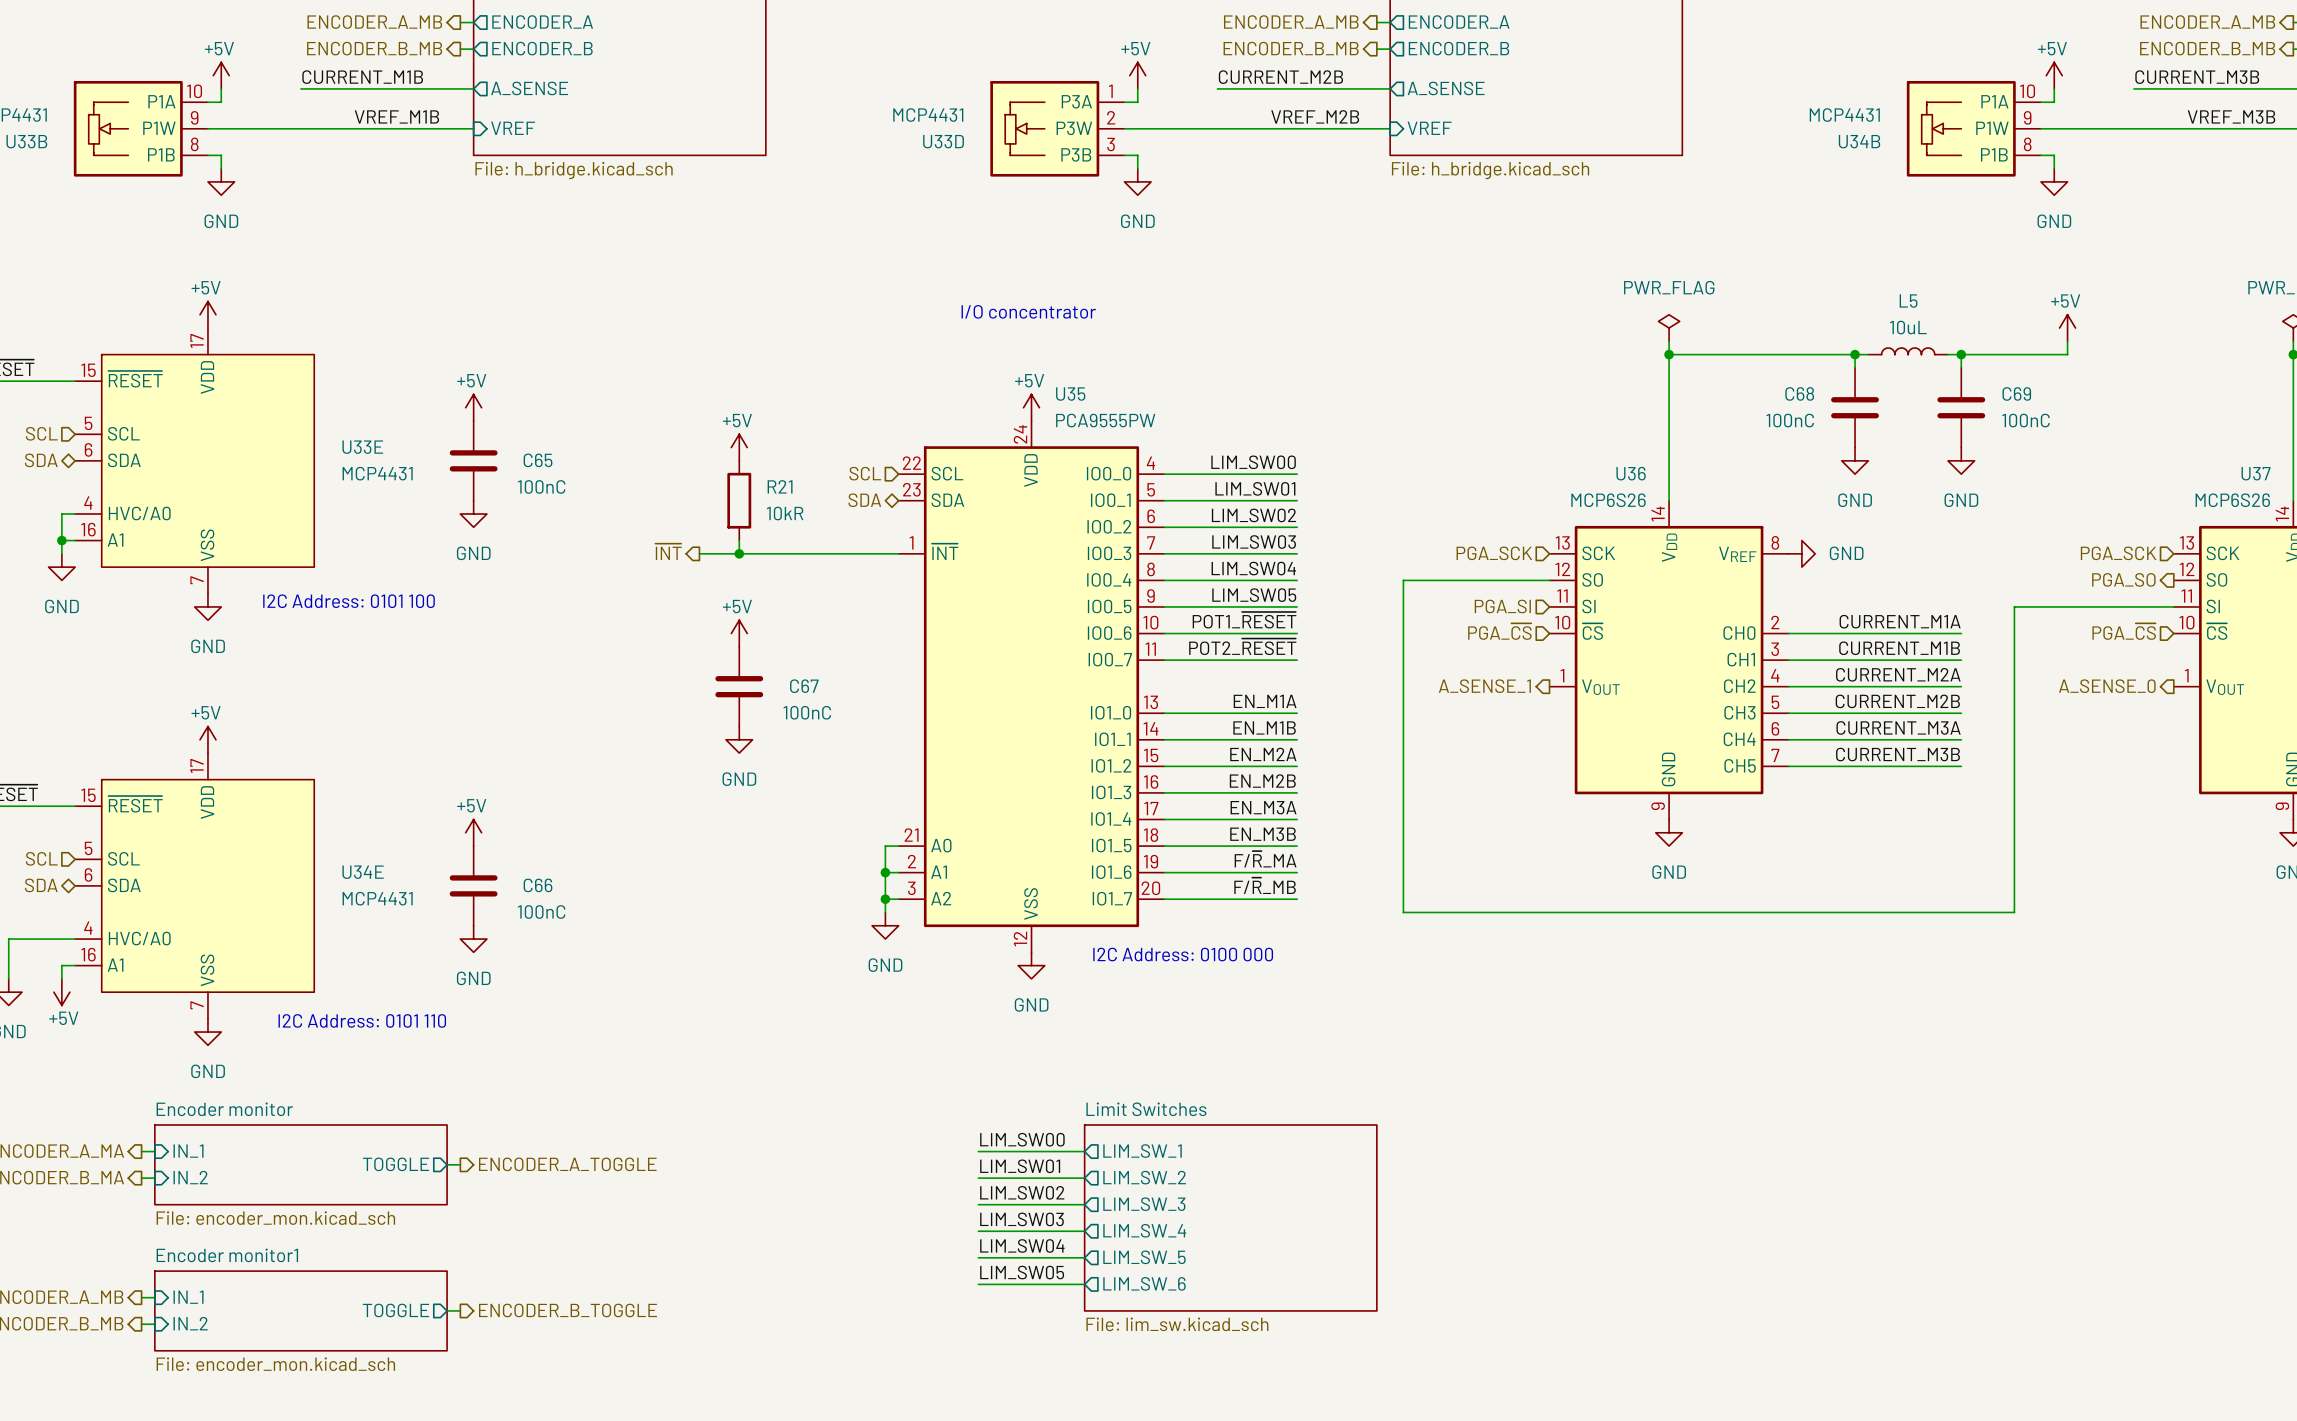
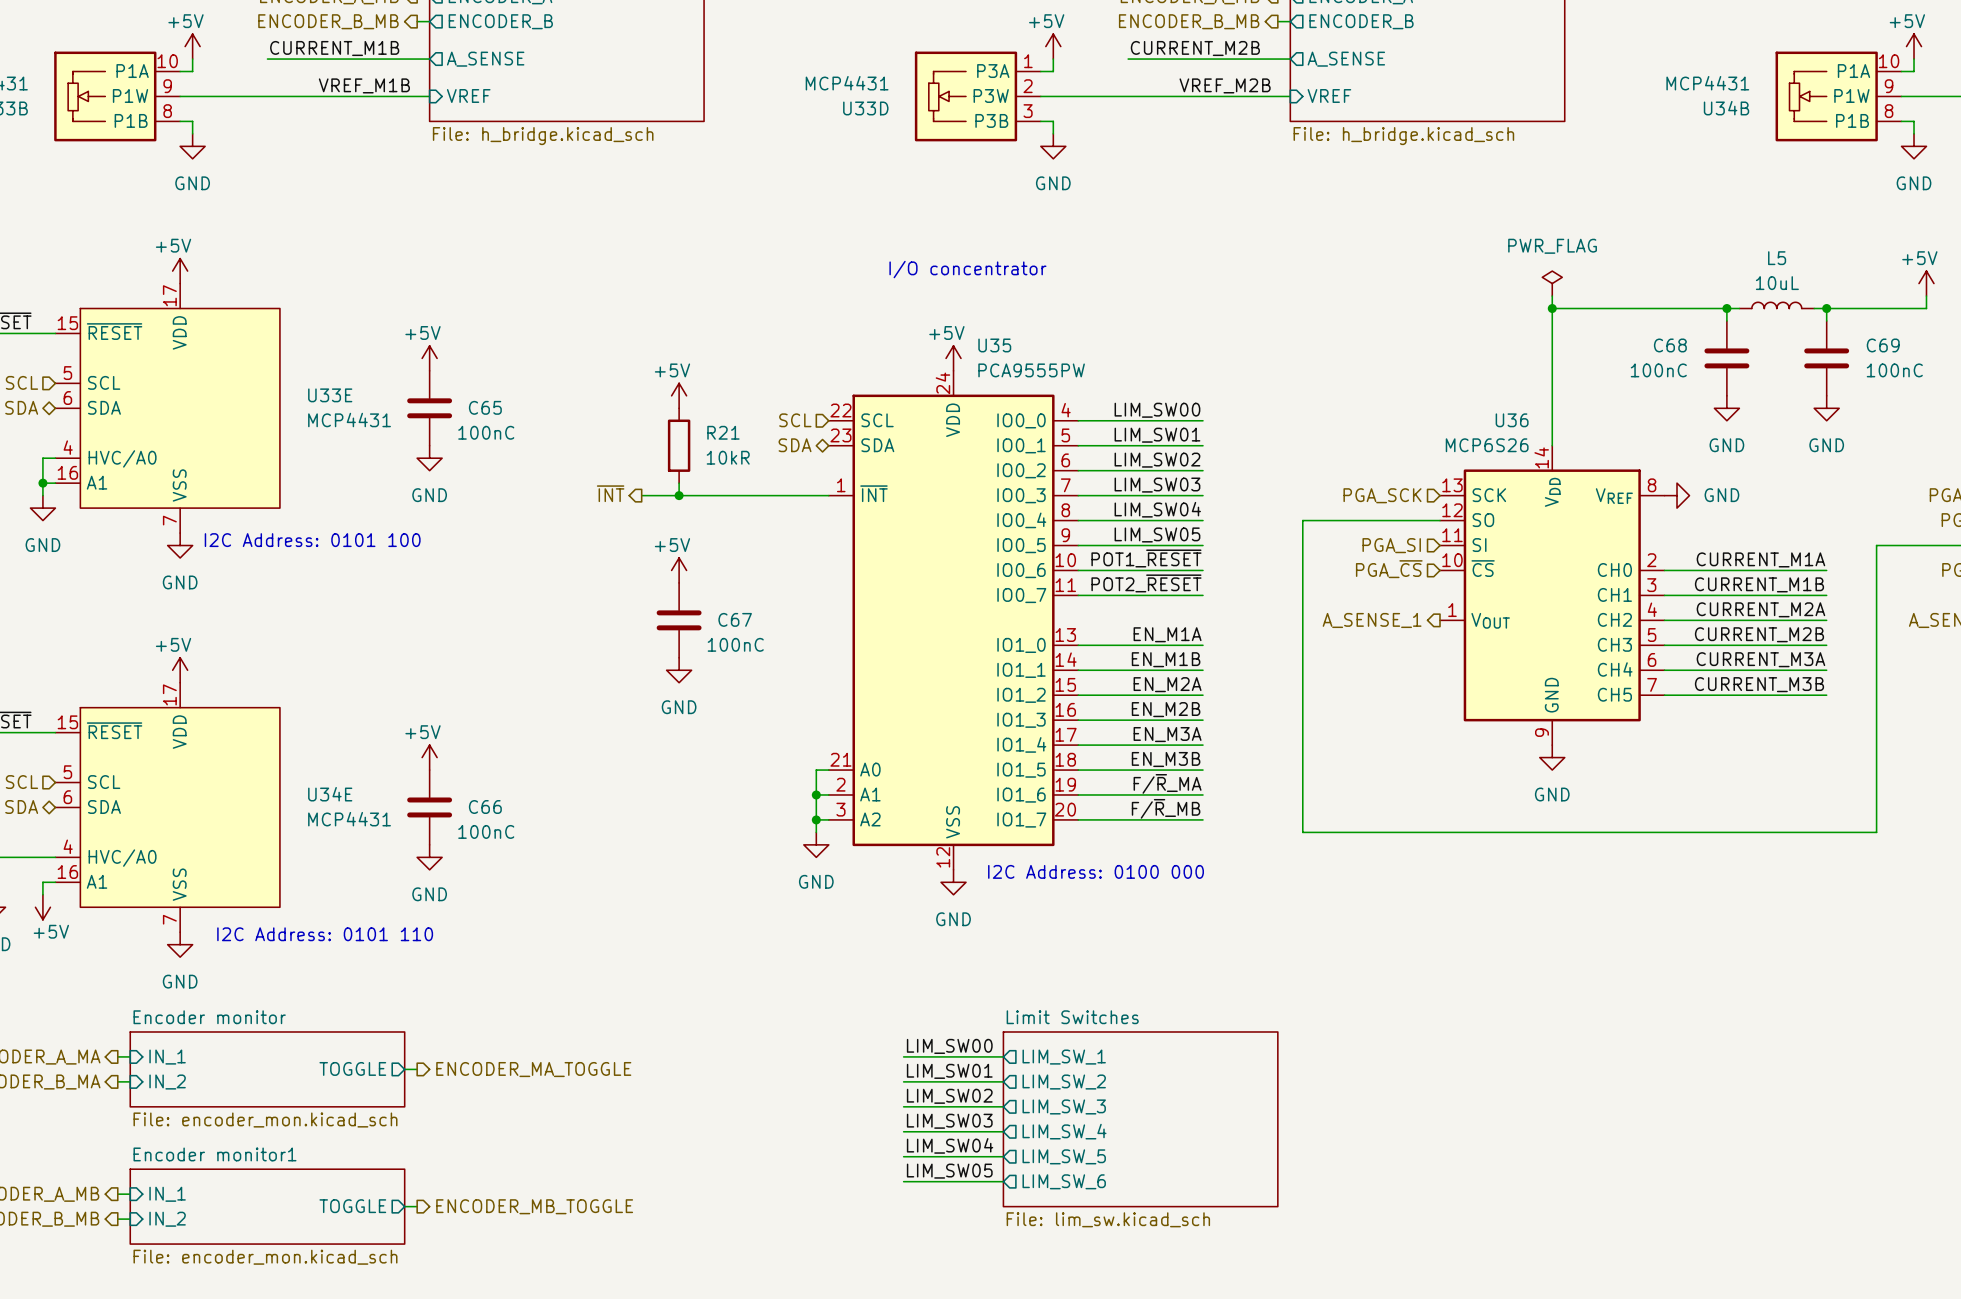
hierarchical label: ENCODER_A_TOGGLE (567, 1164) -> ENCODER_MA_TOGGLE (533, 1069)
hierarchical label: ENCODER_B_TOGGLE (567, 1310) -> ENCODER_MB_TOGGLE (534, 1206)

